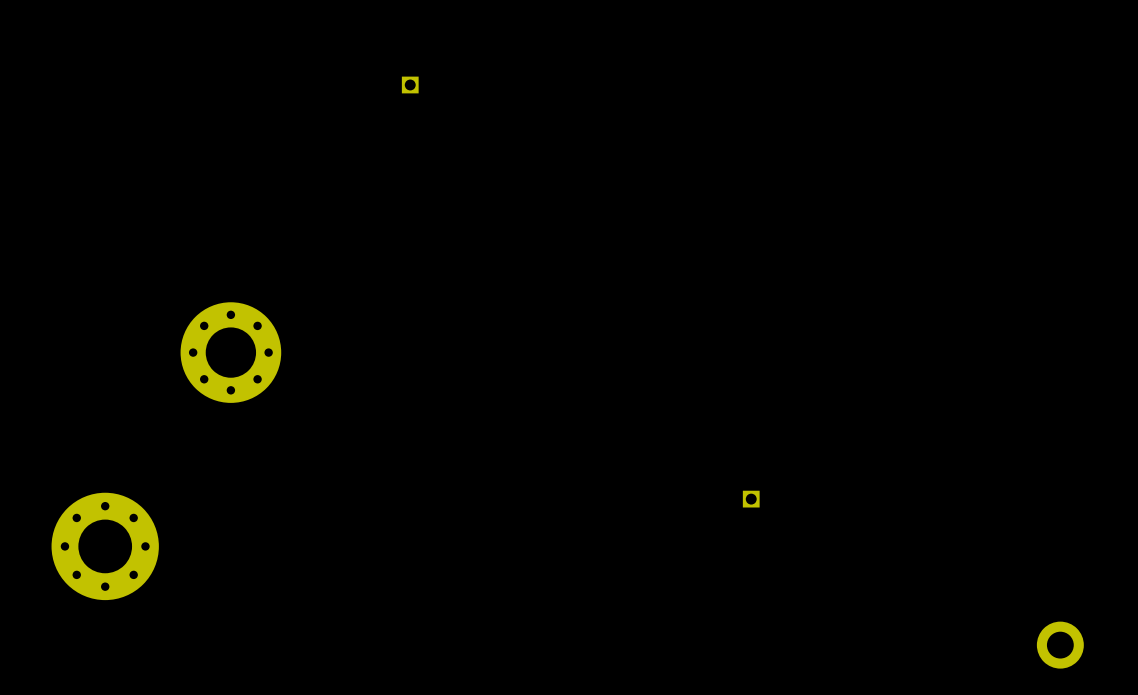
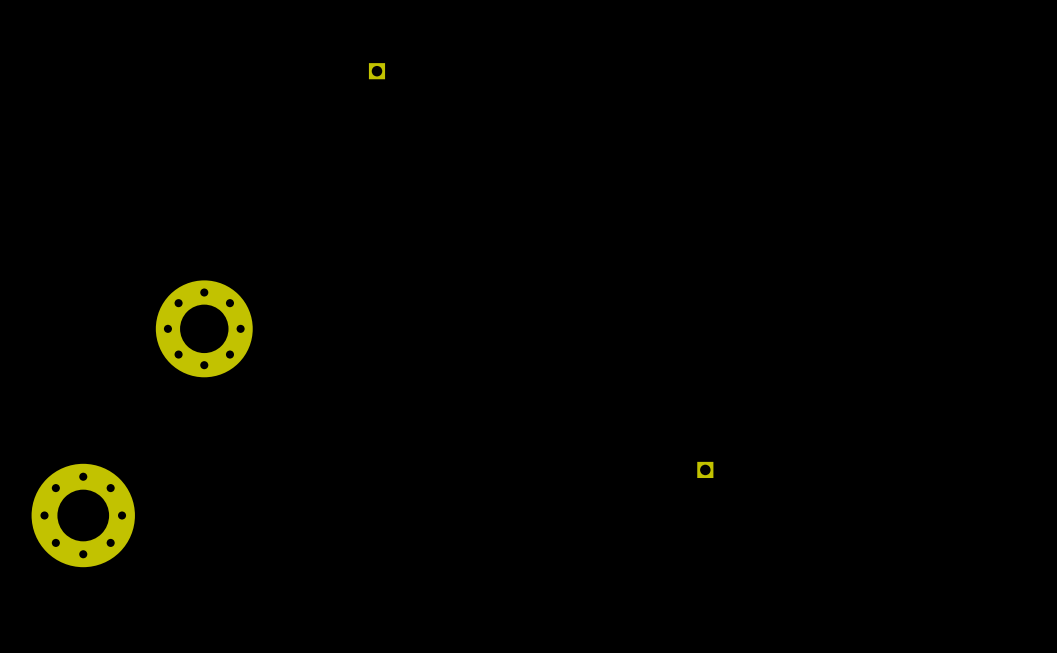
part: (1060, 645) -> none

